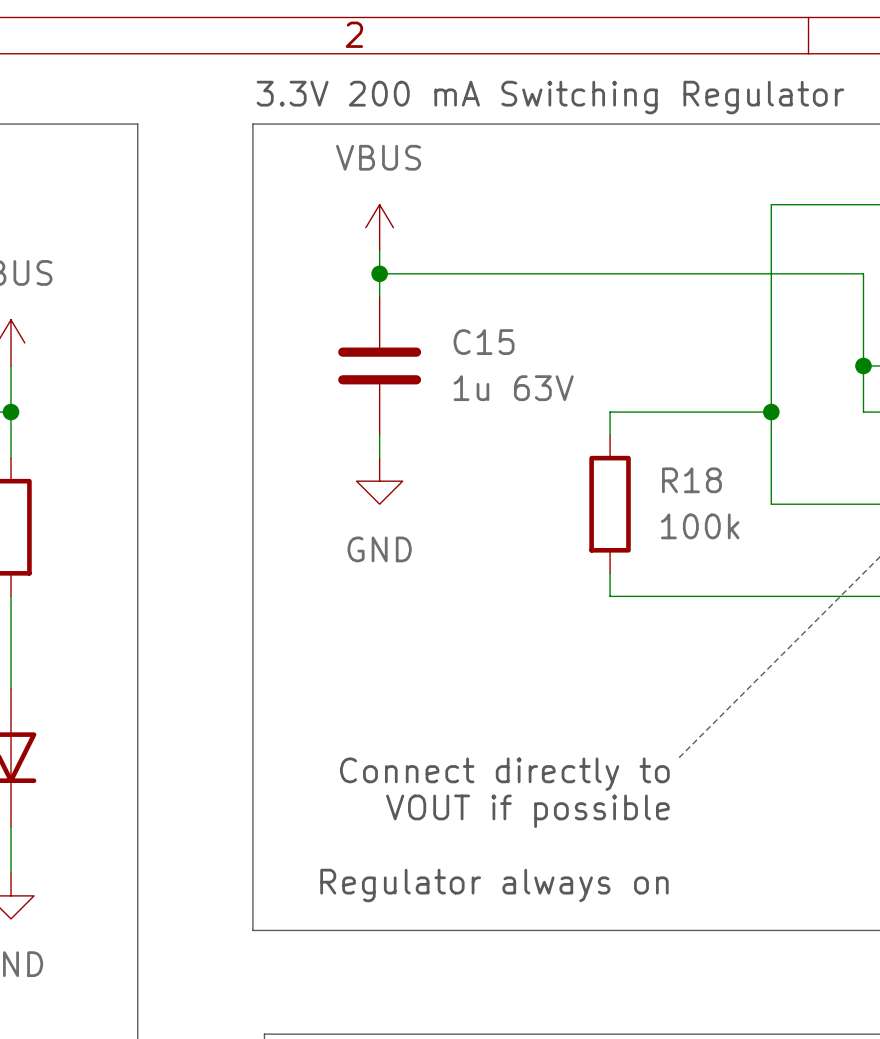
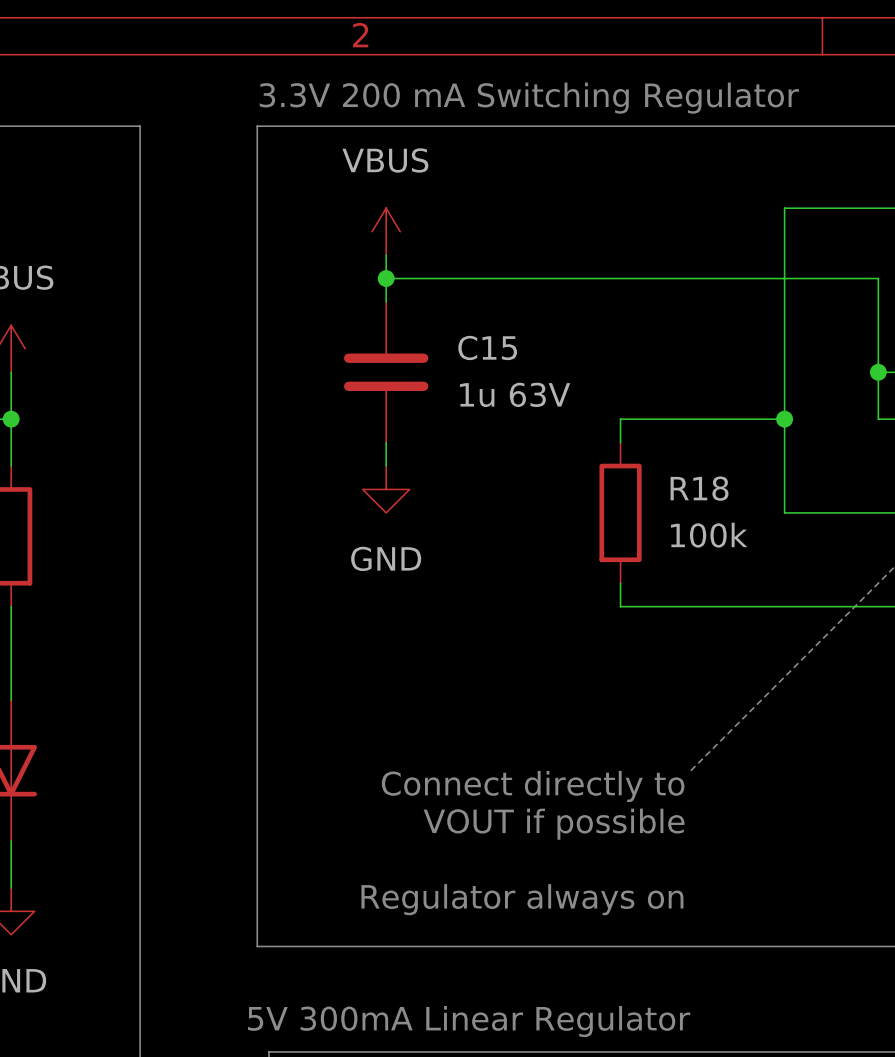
text: none -> 5V 300mA Linear Regulator (469, 1021)

